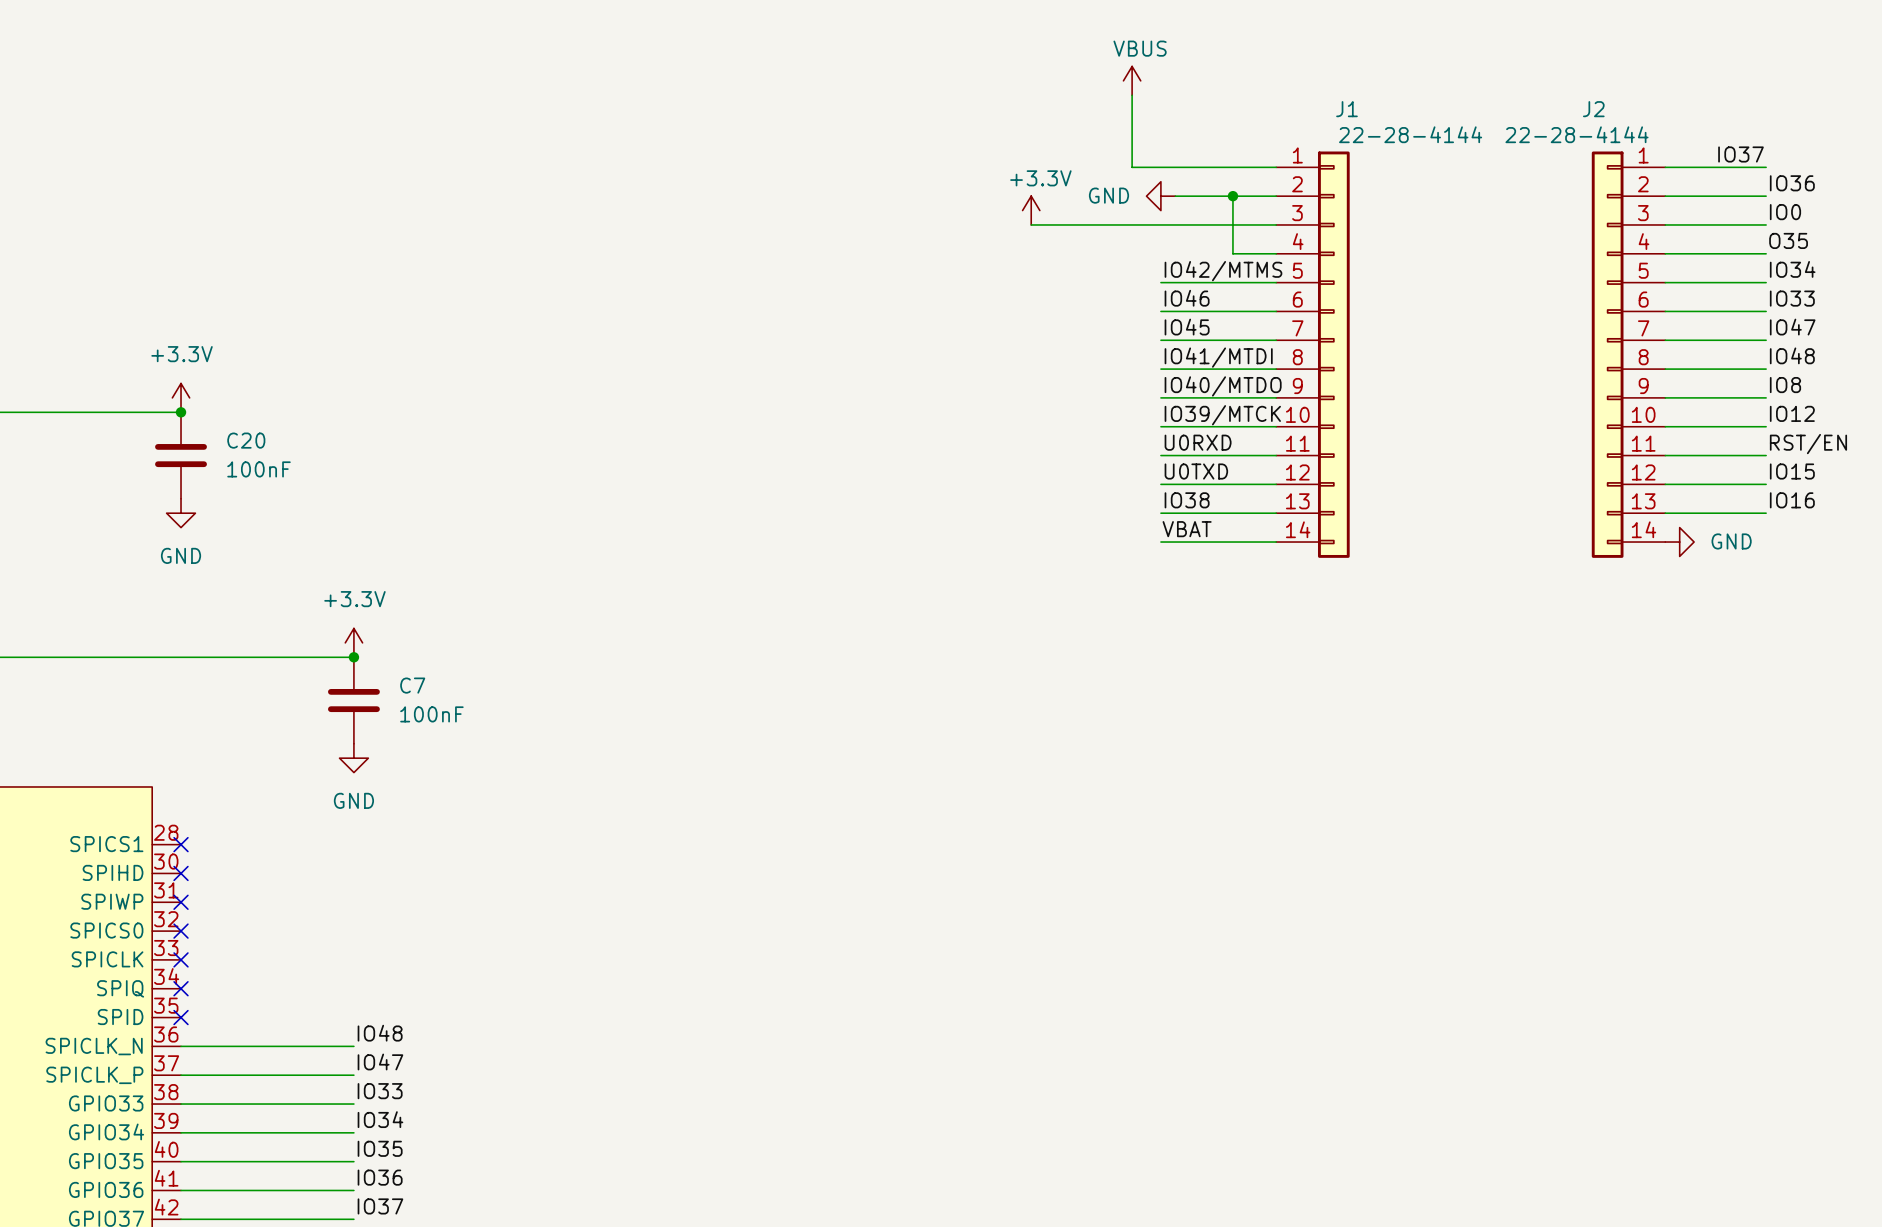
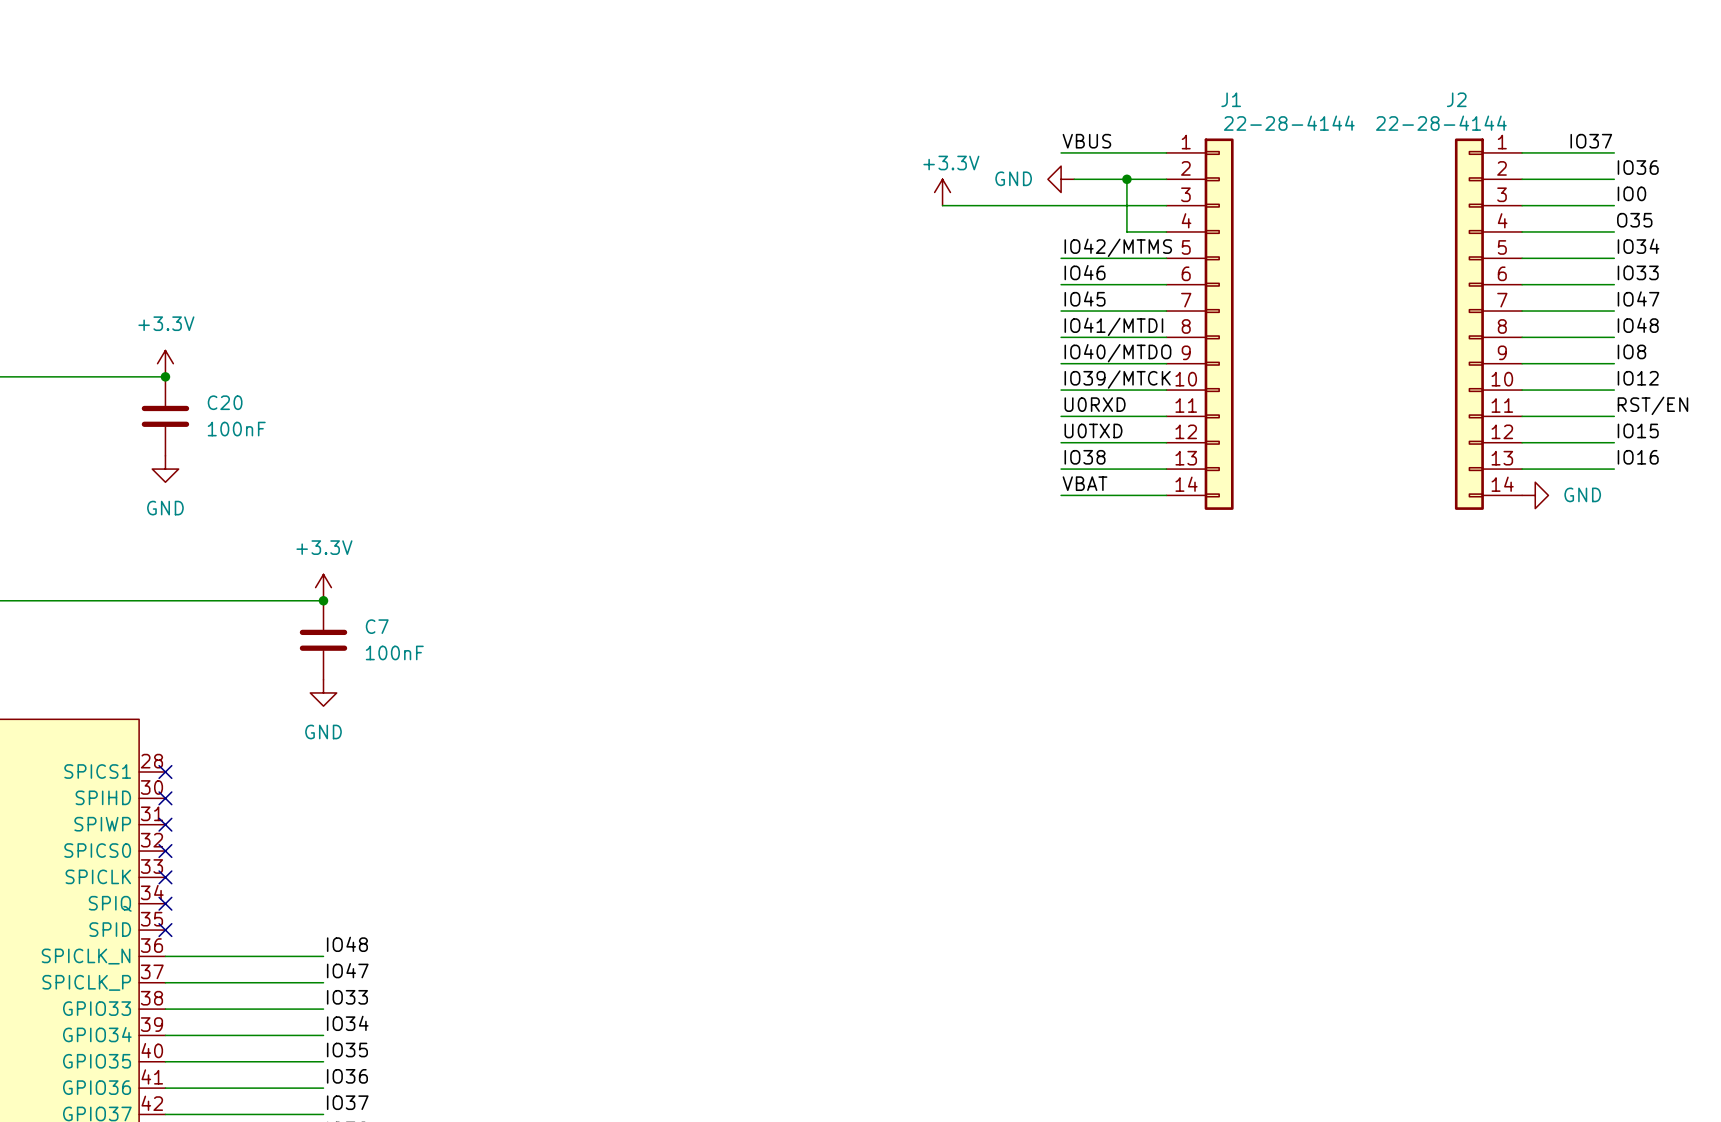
power symbol: VBUS (1132, 80) -> none
wire: (1132, 95) (1132, 167) (1160, 167) -> none
label: none -> VBUS (1086, 141)

